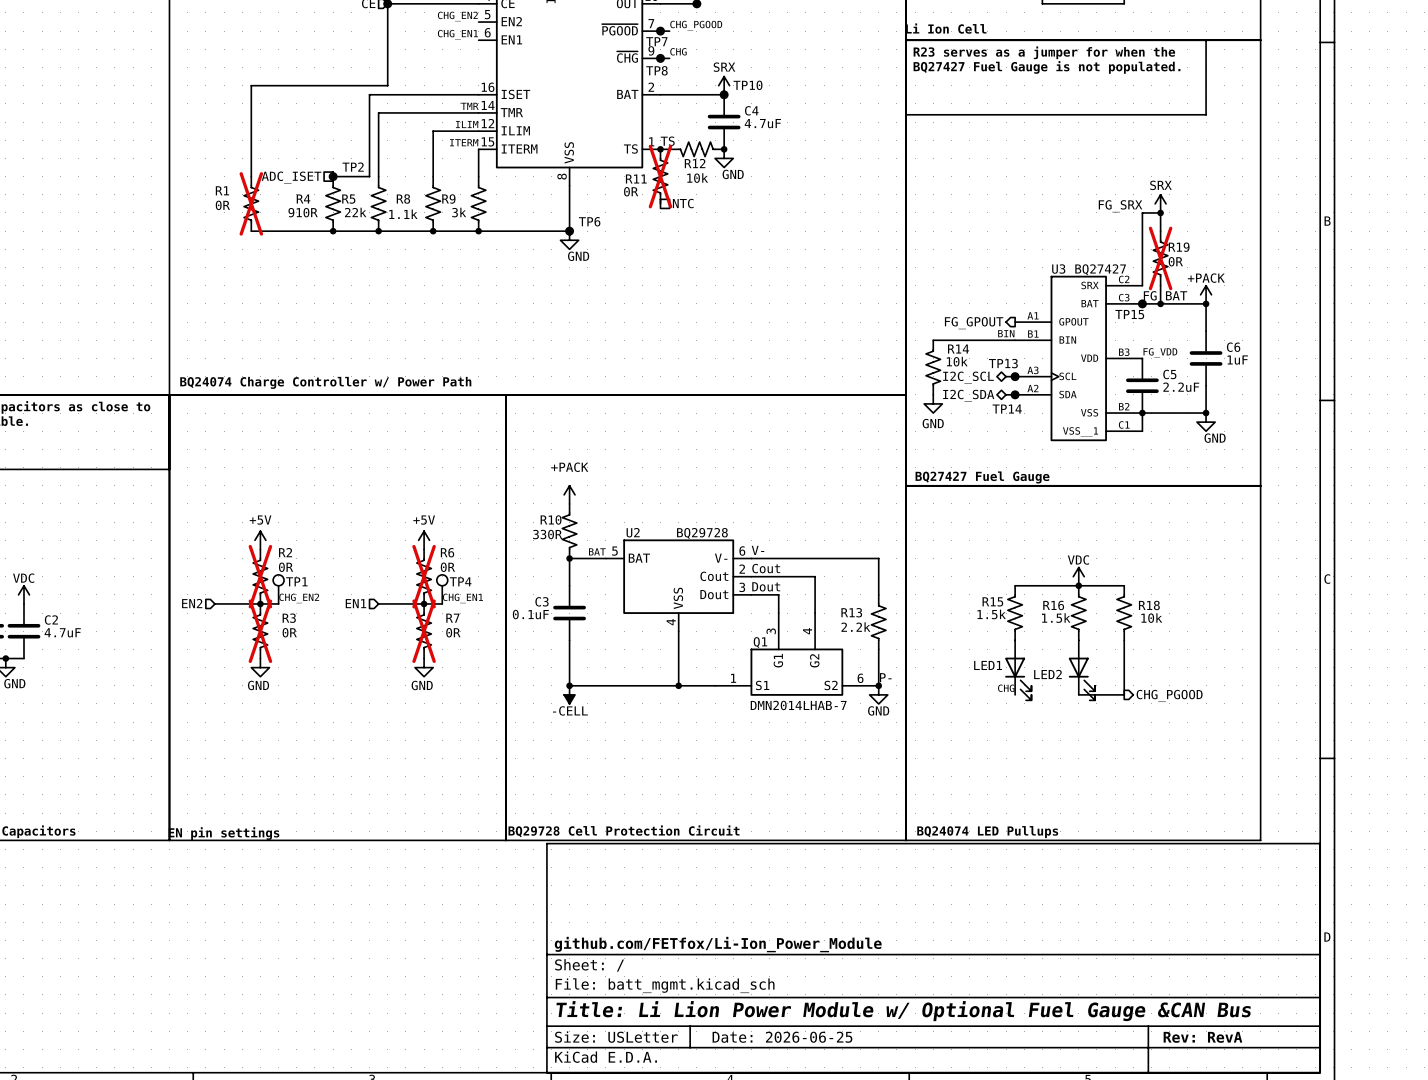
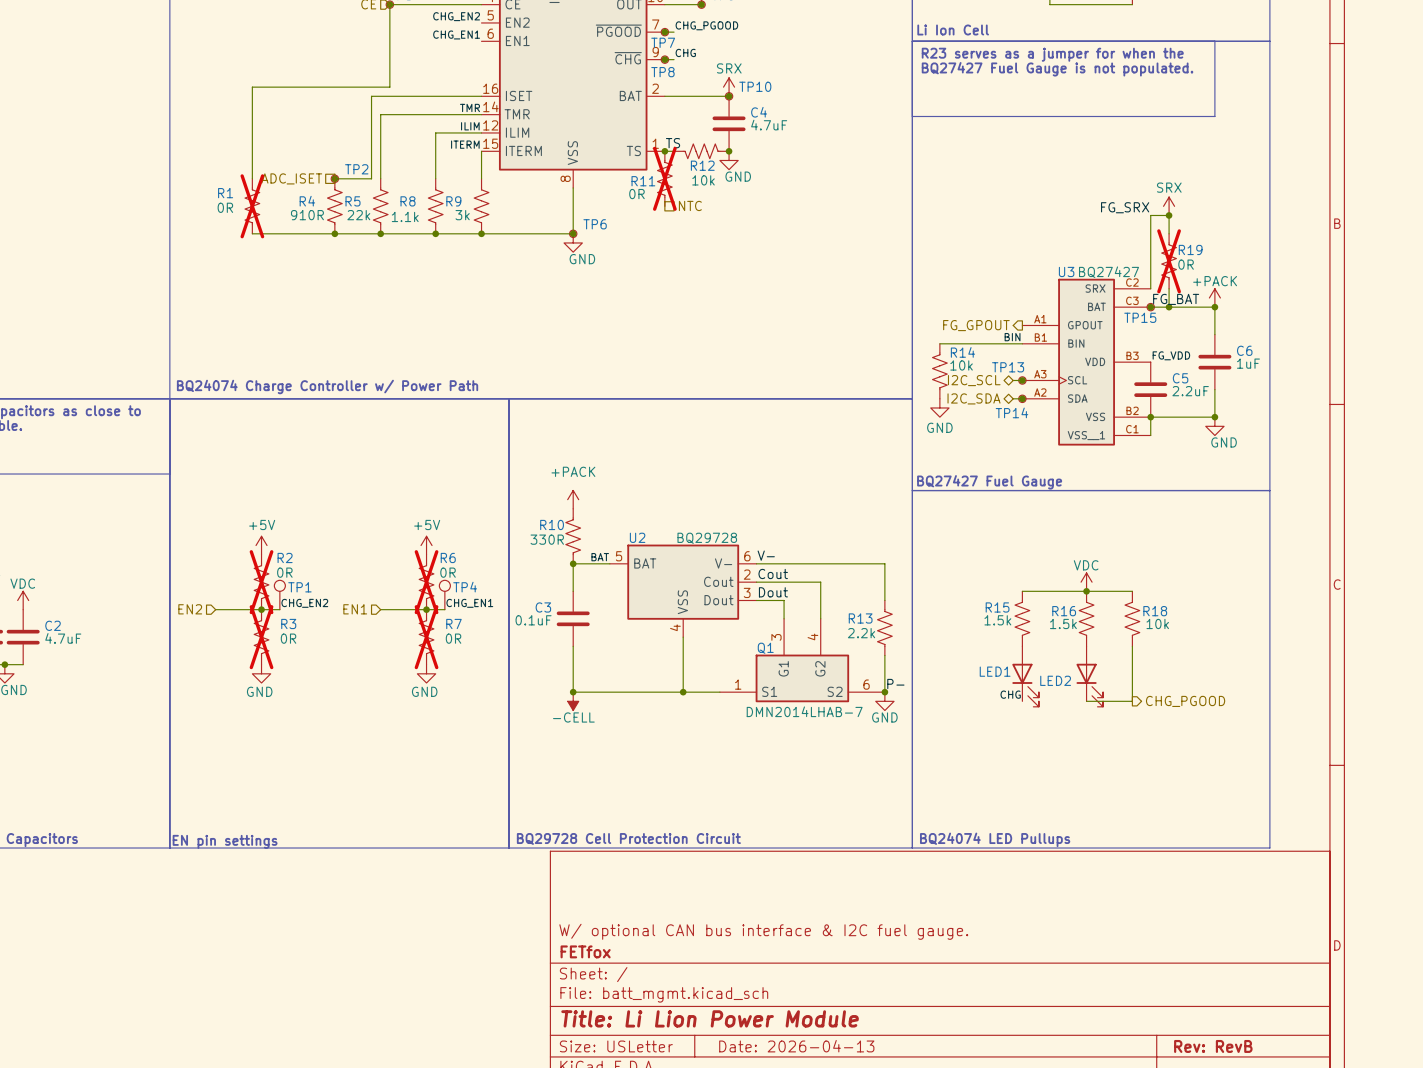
title block: none -> W/ optional CAN bus interface & I2C fuel gauge. (763, 931)
title block: github.com/FETfox/Li-Ion_Power_Module (718, 944) -> FETfox (585, 951)
title block: Title: Li Lion Power Module w/ Optional Fuel Gauge &CAN Bus (903, 1011) -> Title: Li Lion Power Module (710, 1018)
title block: Date: 2026-06-25 (782, 1037) -> Date: 2026-04-13 (796, 1046)
title block: Rev: RevA (1202, 1037) -> Rev: RevB (1213, 1046)

